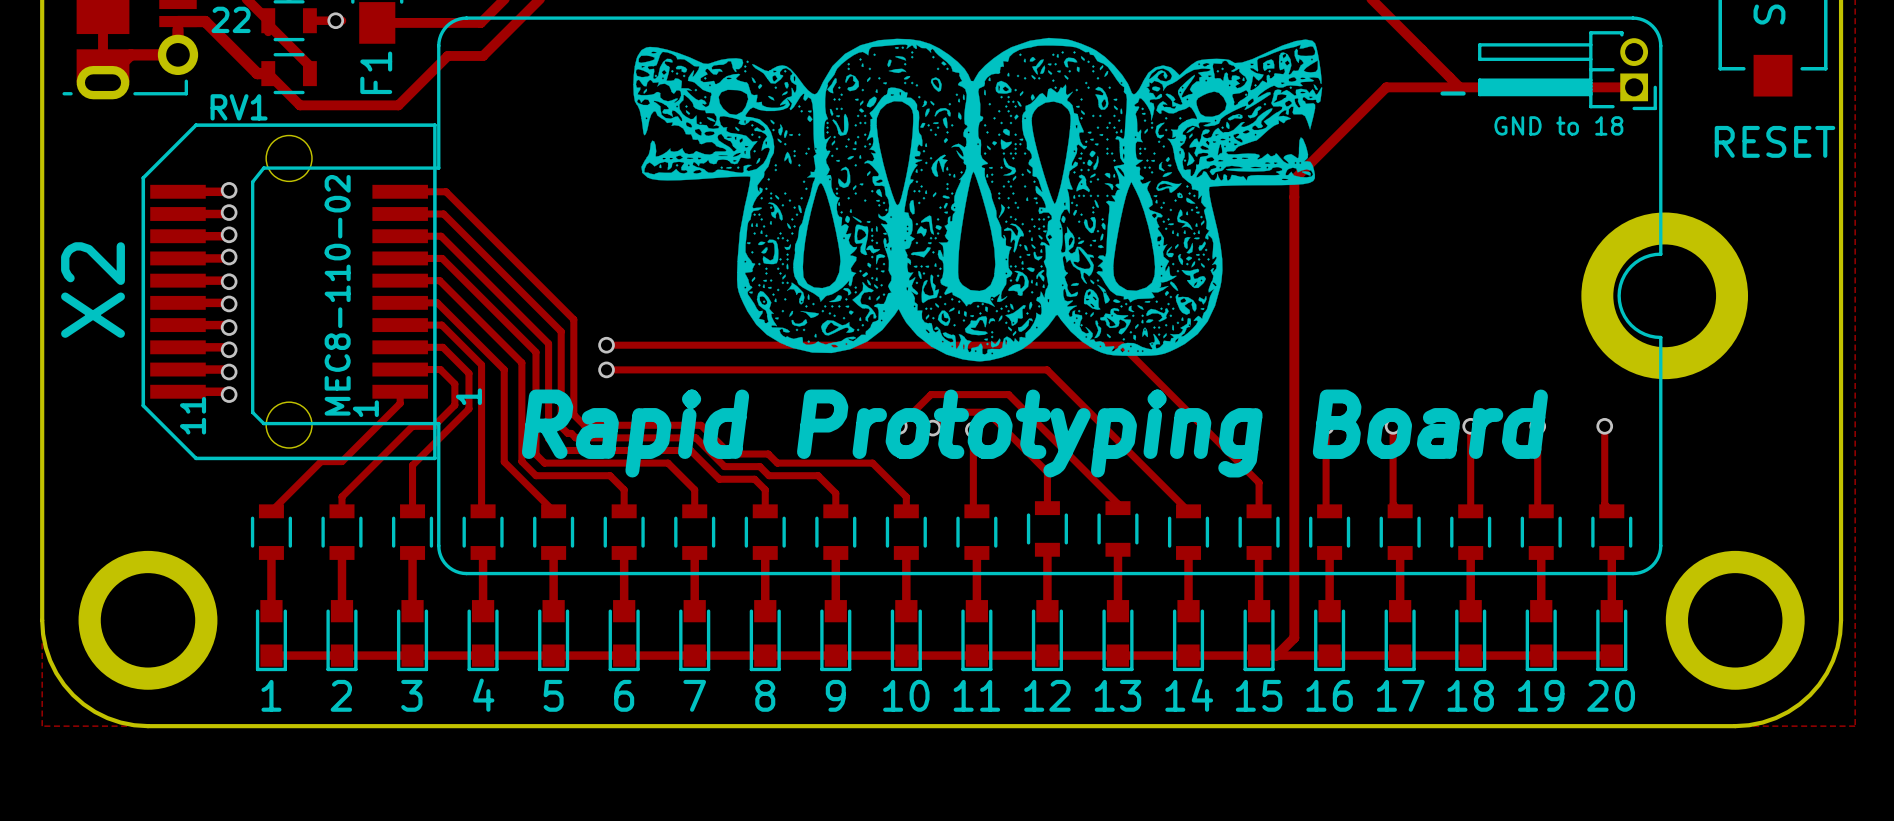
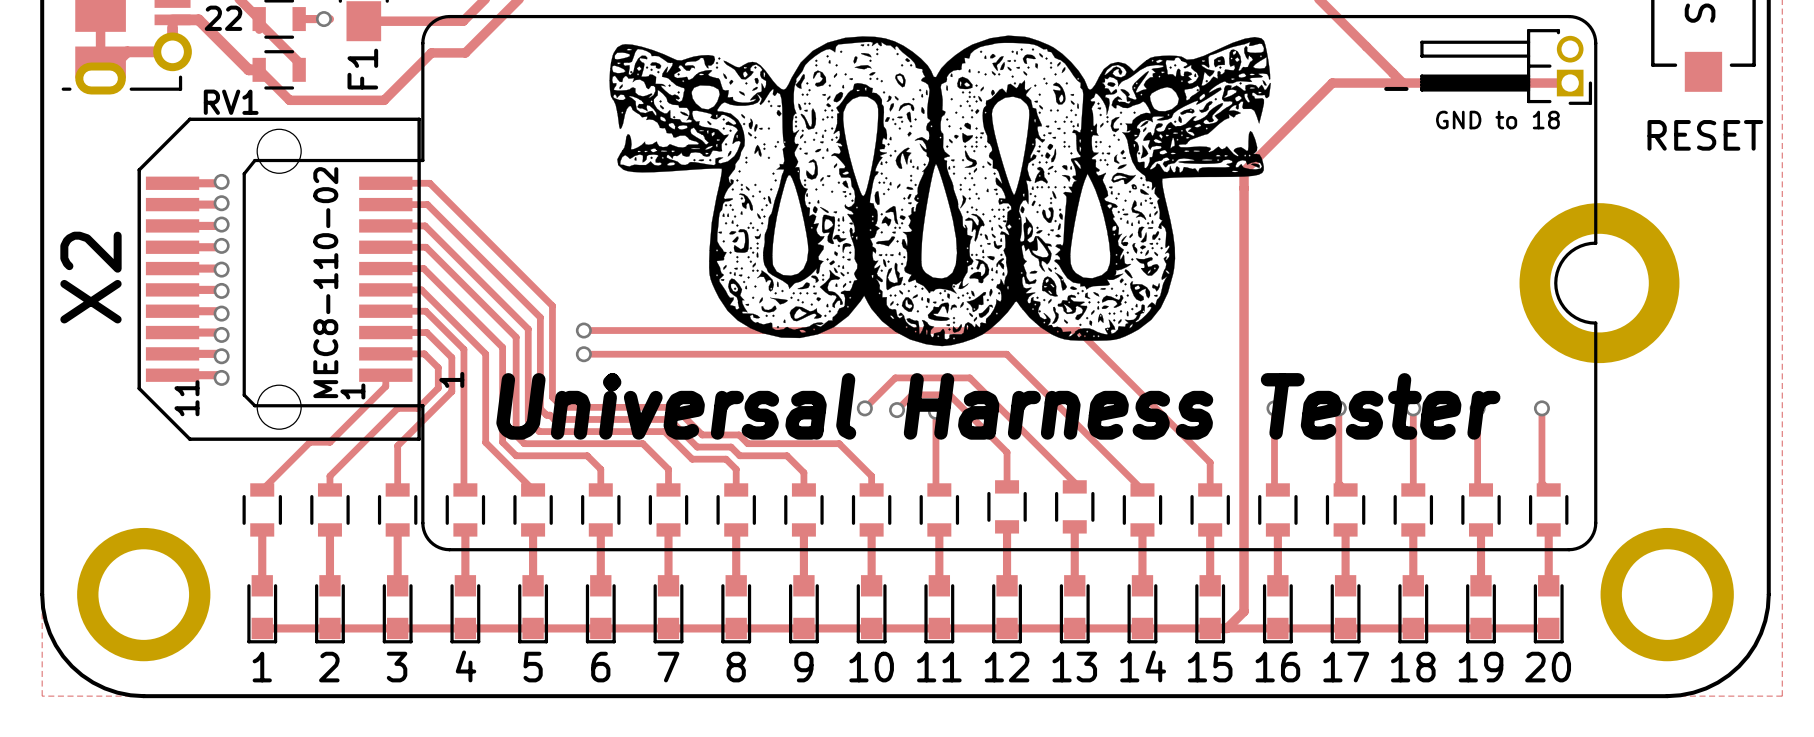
text: Rapid Prototyping Board (1034, 433) -> Universal Harness Tester (998, 406)

